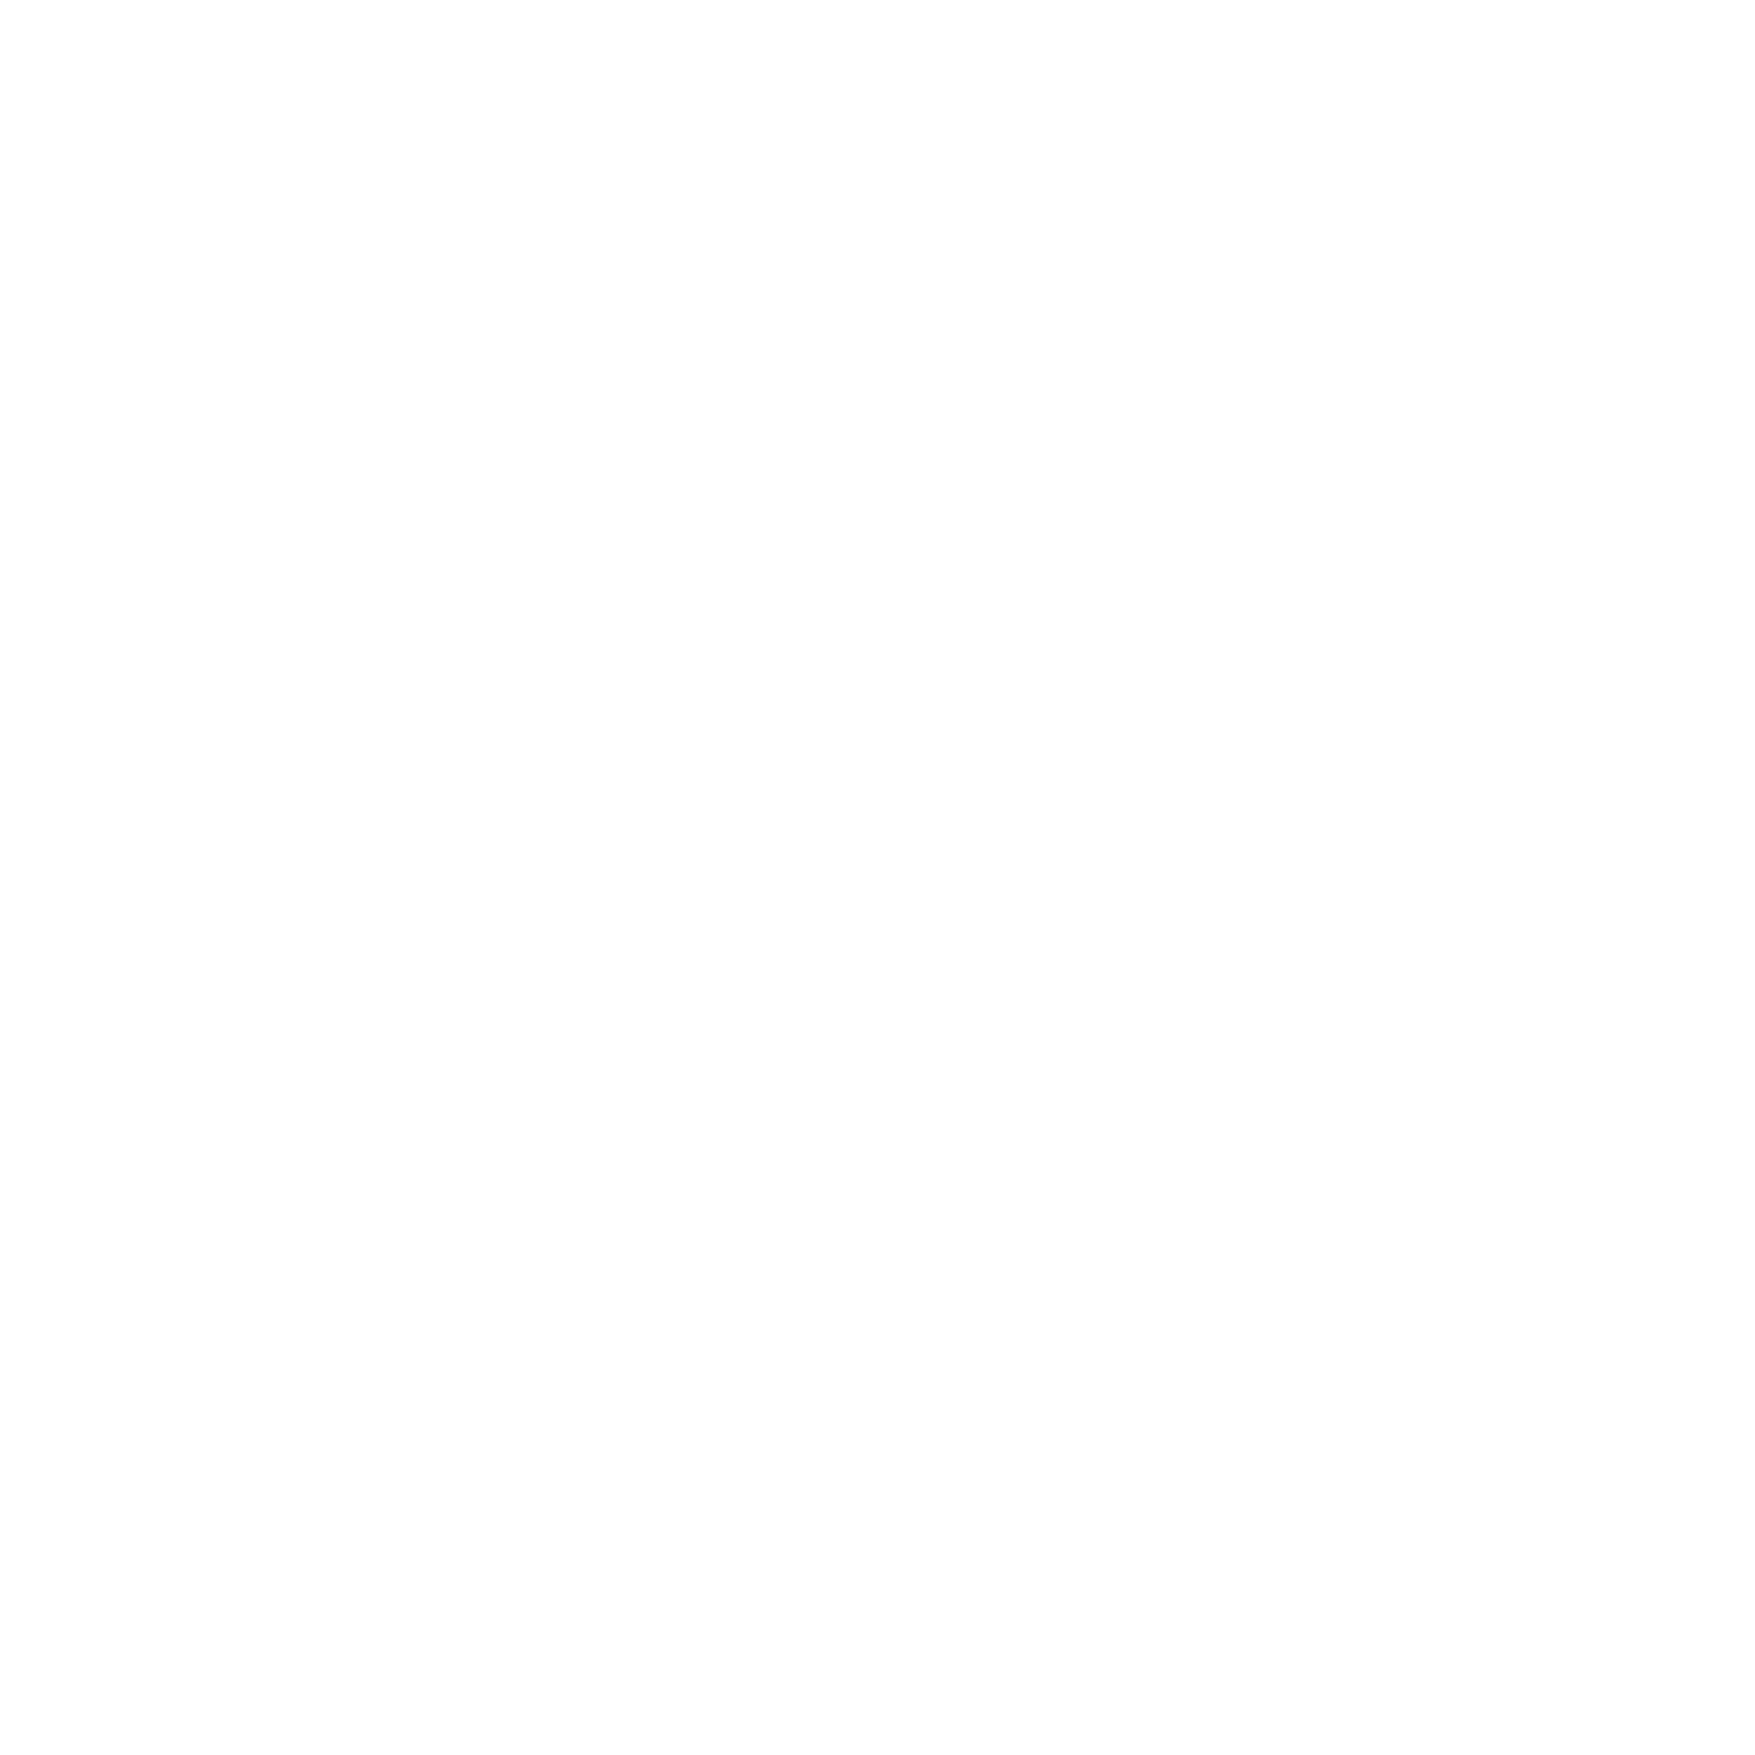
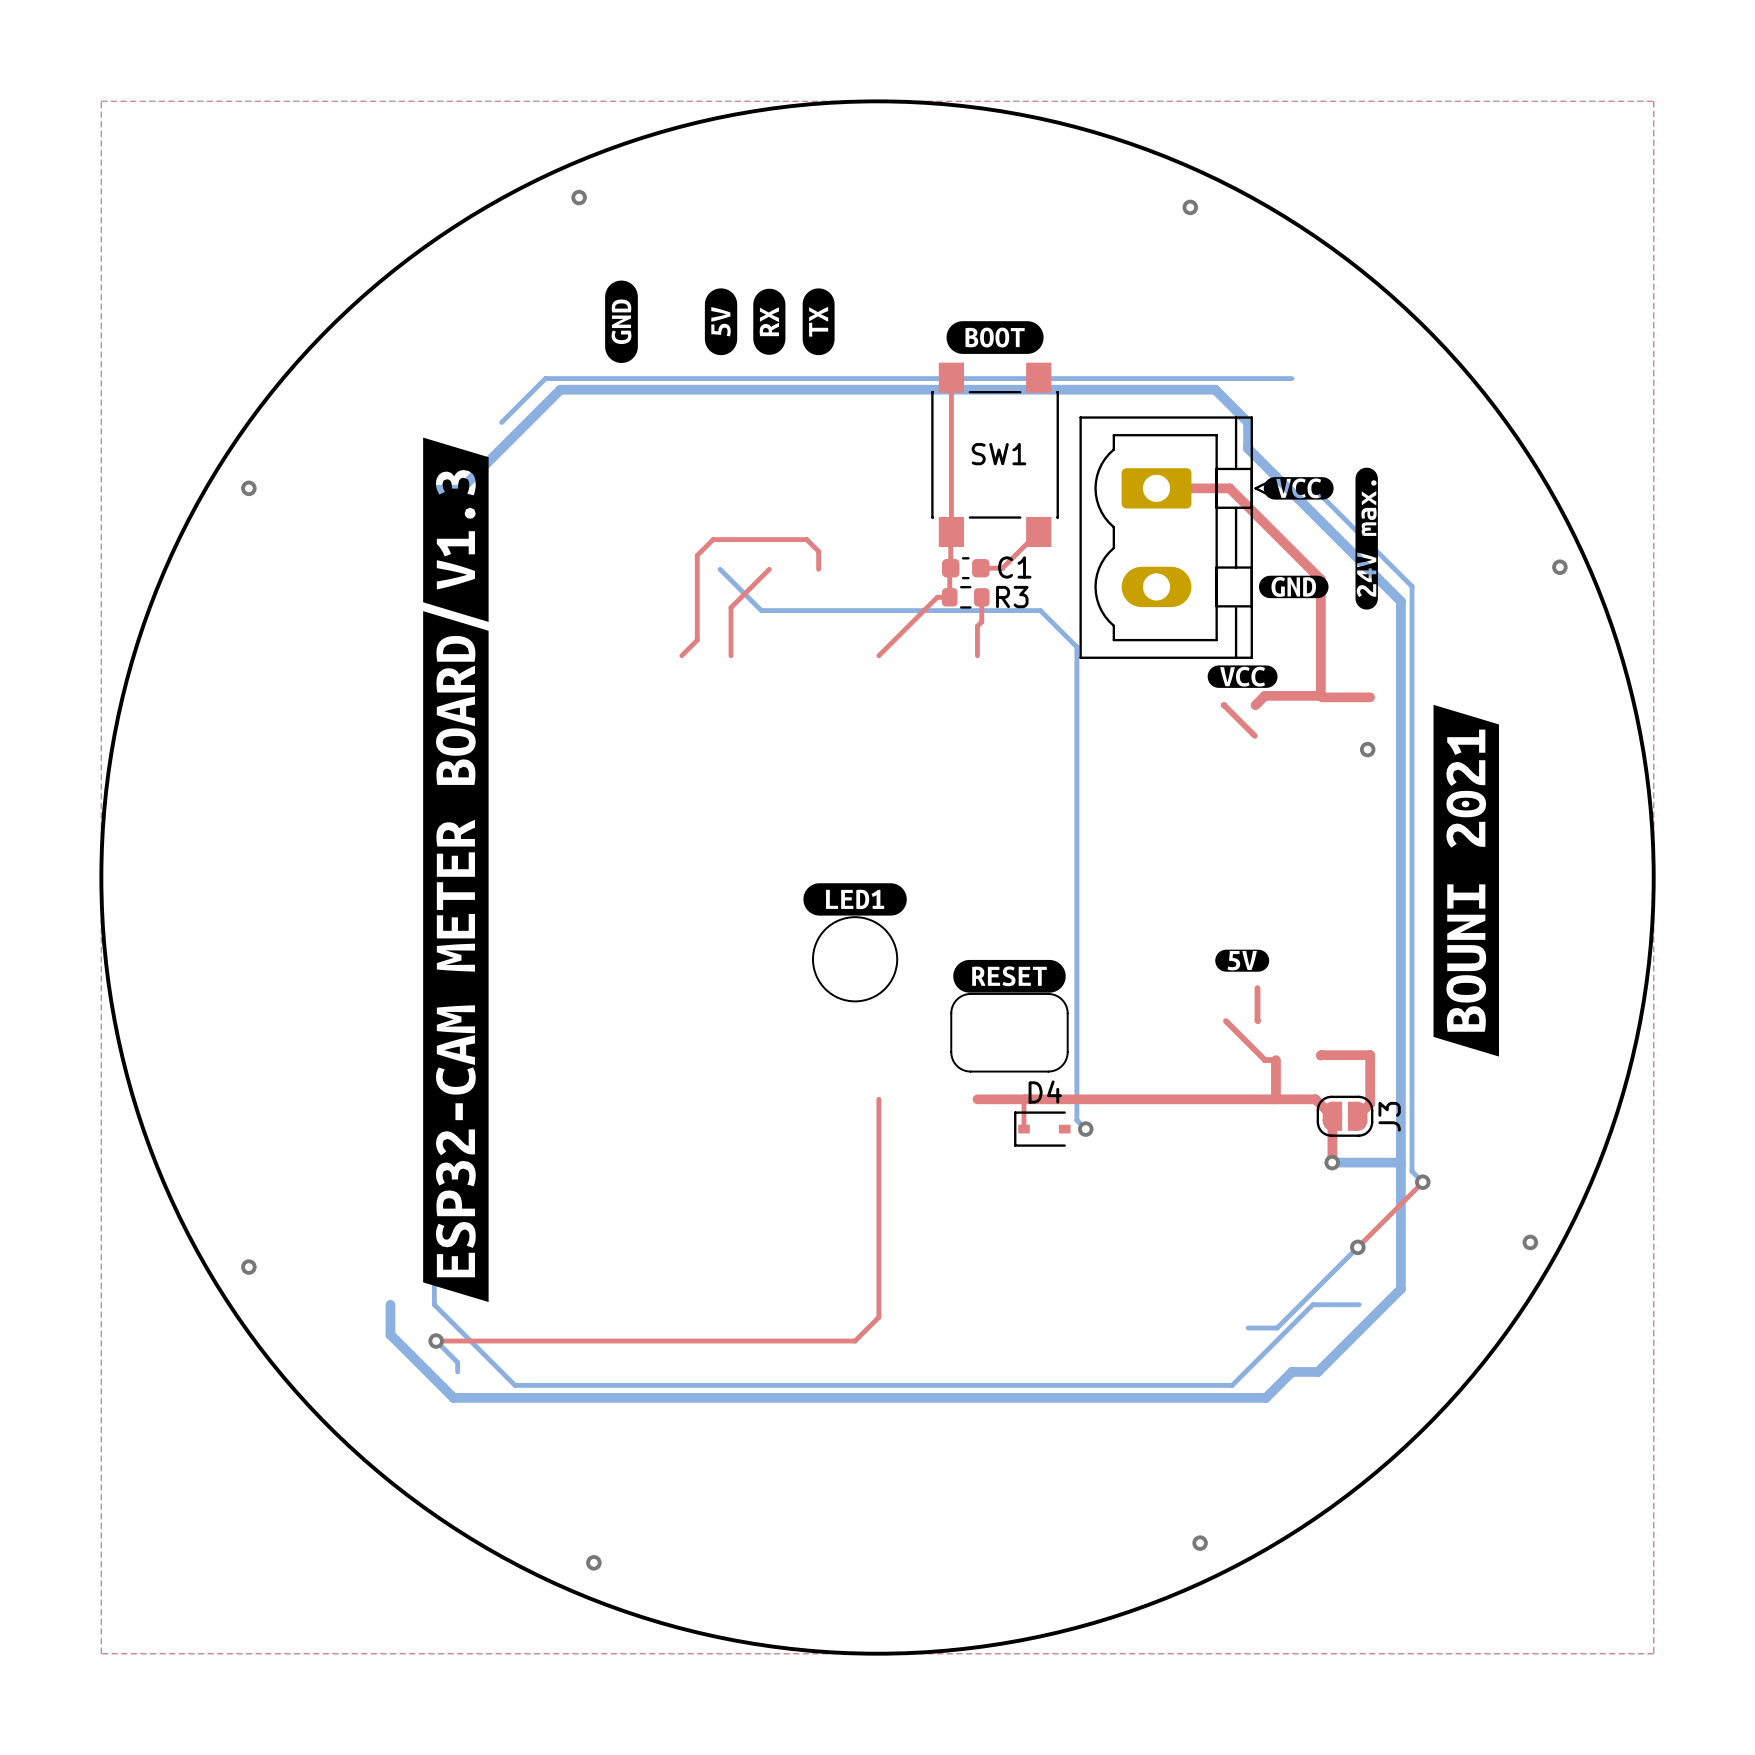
round board edge: none -> [99, 99, 1656, 1656]
top zone outline: none -> (101, 101) (101, 1653) (1653, 1653) (1653, 101) (101, 101)
via: none -> (579, 197)
via: none -> (1190, 207)
drawing: none -> [605, 280, 638, 363]
drawing: none -> [704, 288, 835, 356]
drawing: none -> [946, 321, 1044, 354]
top track: none -> (951, 377) (949, 597) (937, 597) (878, 655)
bottom track: none -> (1291, 378) (545, 378) (501, 422)
drawing: none -> [423, 437, 489, 1303]
SW1: none -> (995, 454)
drawing: none -> [1263, 467, 1378, 610]
via: none -> (248, 488)
top track: none -> (1156, 488) (1229, 488) (1320, 579) (1320, 695)
bottom track: none -> (434, 489) (460, 489) (560, 389) (1215, 389) (1248, 422) (1248, 448) (1400, 601) (1400, 1289) (1318, 1371) (1291, 1371) (1266, 1397) (453, 1397) (390, 1334) (390, 1304)
bottom track: none -> (1315, 489) (1412, 586) (1412, 1171) (1422, 1182)
top track: none -> (1038, 531) (1002, 568) (980, 568)
part: none -> (1173, 537)
via: none -> (1559, 567)
C1: none -> (965, 568)
bottom track: none -> (720, 569) (761, 610) (1040, 610) (1076, 647) (1076, 1120) (1085, 1129)
top track: none -> (769, 569) (731, 607) (731, 655)
top track: none -> (818, 569) (818, 551) (806, 539) (713, 539) (697, 555) (697, 640) (681, 655)
drawing: none -> [1258, 575, 1329, 599]
R3: none -> (965, 597)
top track: none -> (981, 597) (981, 621) (977, 626)
top track: none -> (977, 626) (977, 655)
drawing: none -> [1207, 665, 1278, 688]
top track: none -> (1320, 695) (1370, 697)
top track: none -> (1320, 695) (1264, 695) (1255, 705)
drawing: none -> [1433, 704, 1499, 1057]
top track: none -> (1223, 705) (1254, 735)
via: none -> (1367, 749)
drawing: none -> [803, 883, 907, 916]
round board edge: none -> [812, 916, 899, 1003]
drawing: none -> [1215, 949, 1270, 972]
drawing: none -> [953, 959, 1066, 993]
top track: none -> (1257, 988) (1258, 1021)
board edge: none -> (970, 993) (1048, 993) (1060, 998) (1065, 1004) (1067, 1013) (1067, 1054) (1063, 1064) (1056, 1069) (1048, 1071) (970, 1071) (958, 1067) (951, 1054) (951, 1011) (956, 999) (970, 993)
top track: none -> (1225, 1021) (1264, 1060) (1275, 1060) (1274, 1099)
top track: none -> (1320, 1055) (1370, 1055) (1370, 1103) (1357, 1116)
top track: none -> (878, 1099) (878, 1317) (855, 1341) (436, 1341)
top track: none -> (977, 1099) (1315, 1099) (1332, 1116) (1332, 1162)
top track: none -> (1024, 1099) (1023, 1129)
J3: none -> (1345, 1116)
D4: none -> (1042, 1129)
via: none -> (1085, 1129)
bottom track: none -> (1332, 1162) (1400, 1163)
via: none -> (1332, 1162)
top track: none -> (1422, 1182) (1357, 1247)
via: none -> (1422, 1182)
via: none -> (1530, 1242)
bottom track: none -> (1357, 1247) (1277, 1328) (1248, 1328)
via: none -> (1357, 1247)
bottom track: none -> (434, 1260) (434, 1304) (515, 1385) (1232, 1385) (1312, 1304) (1359, 1304)
via: none -> (248, 1267)
bottom track: none -> (436, 1341) (457, 1362) (457, 1371)
via: none -> (436, 1341)
via: none -> (1200, 1543)
via: none -> (593, 1562)

